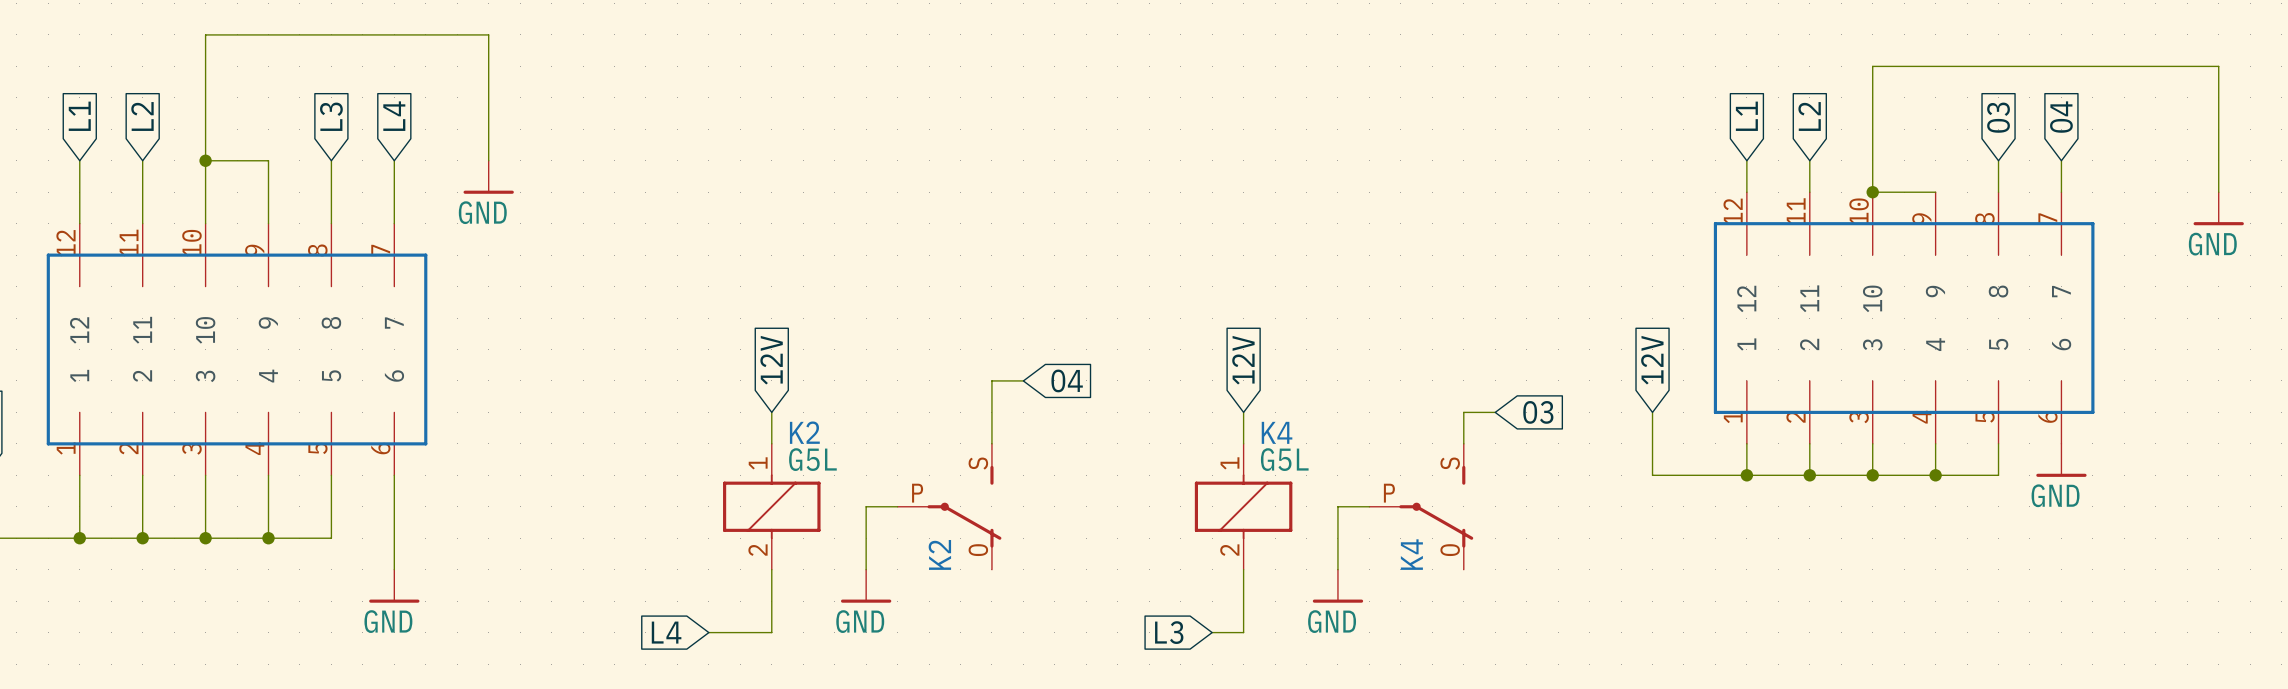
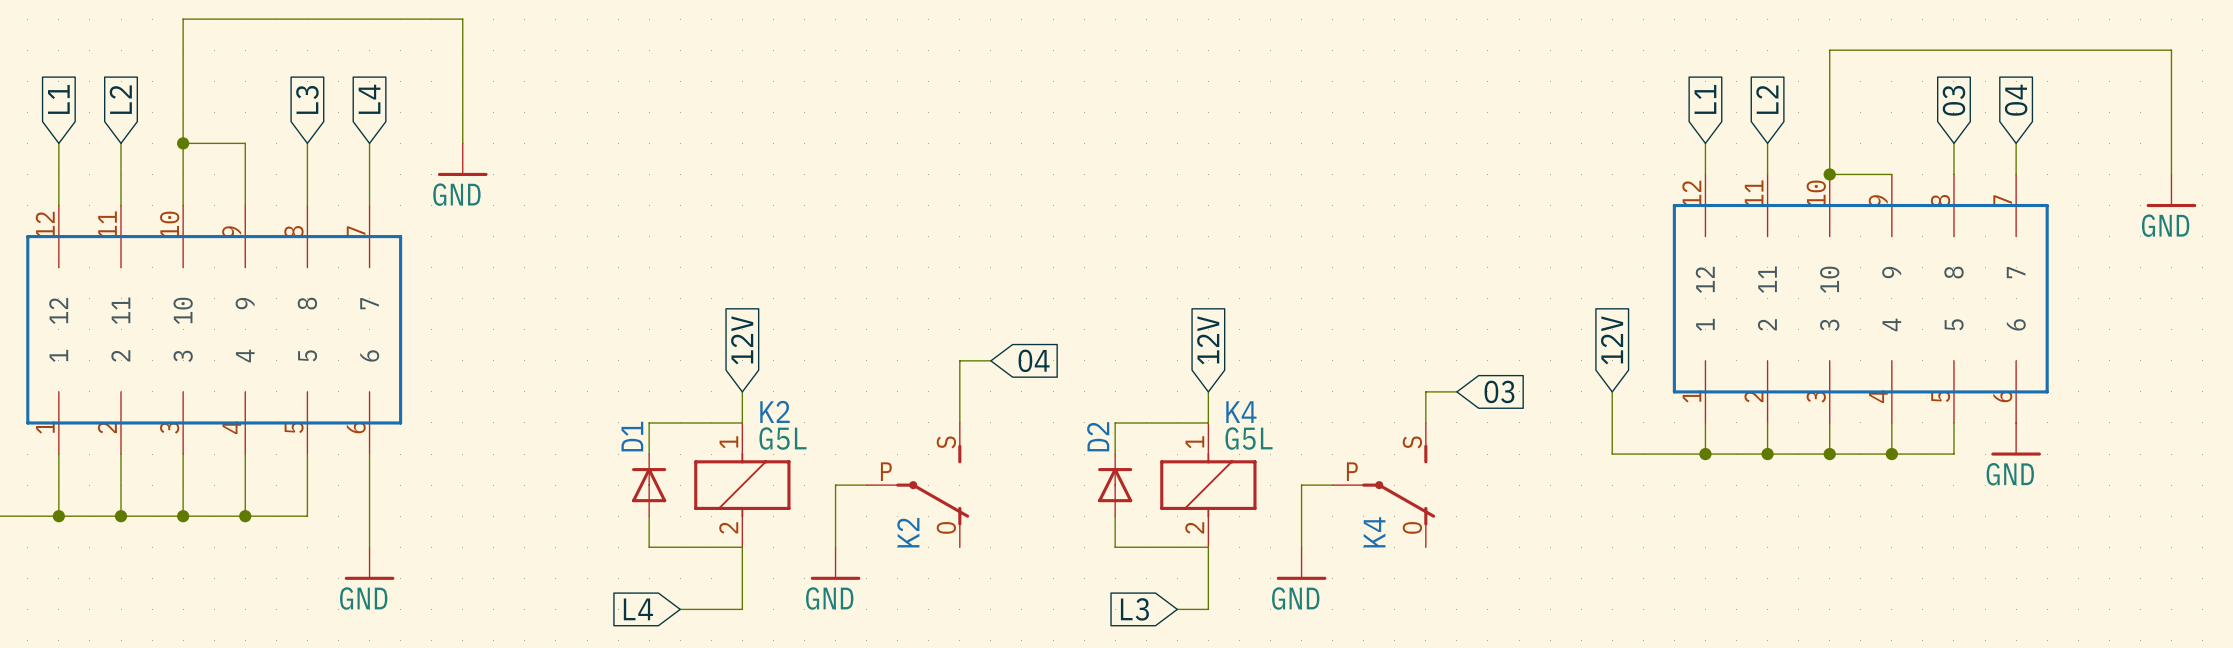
wire: none -> (742, 422) (649, 422) (649, 454)
wire: none -> (1208, 422) (1115, 422) (1115, 454)
D1: none -> (649, 485)
D2: none -> (1115, 485)
wire: none -> (649, 516) (649, 547) (742, 547)
wire: none -> (1115, 516) (1115, 547) (1208, 547)

